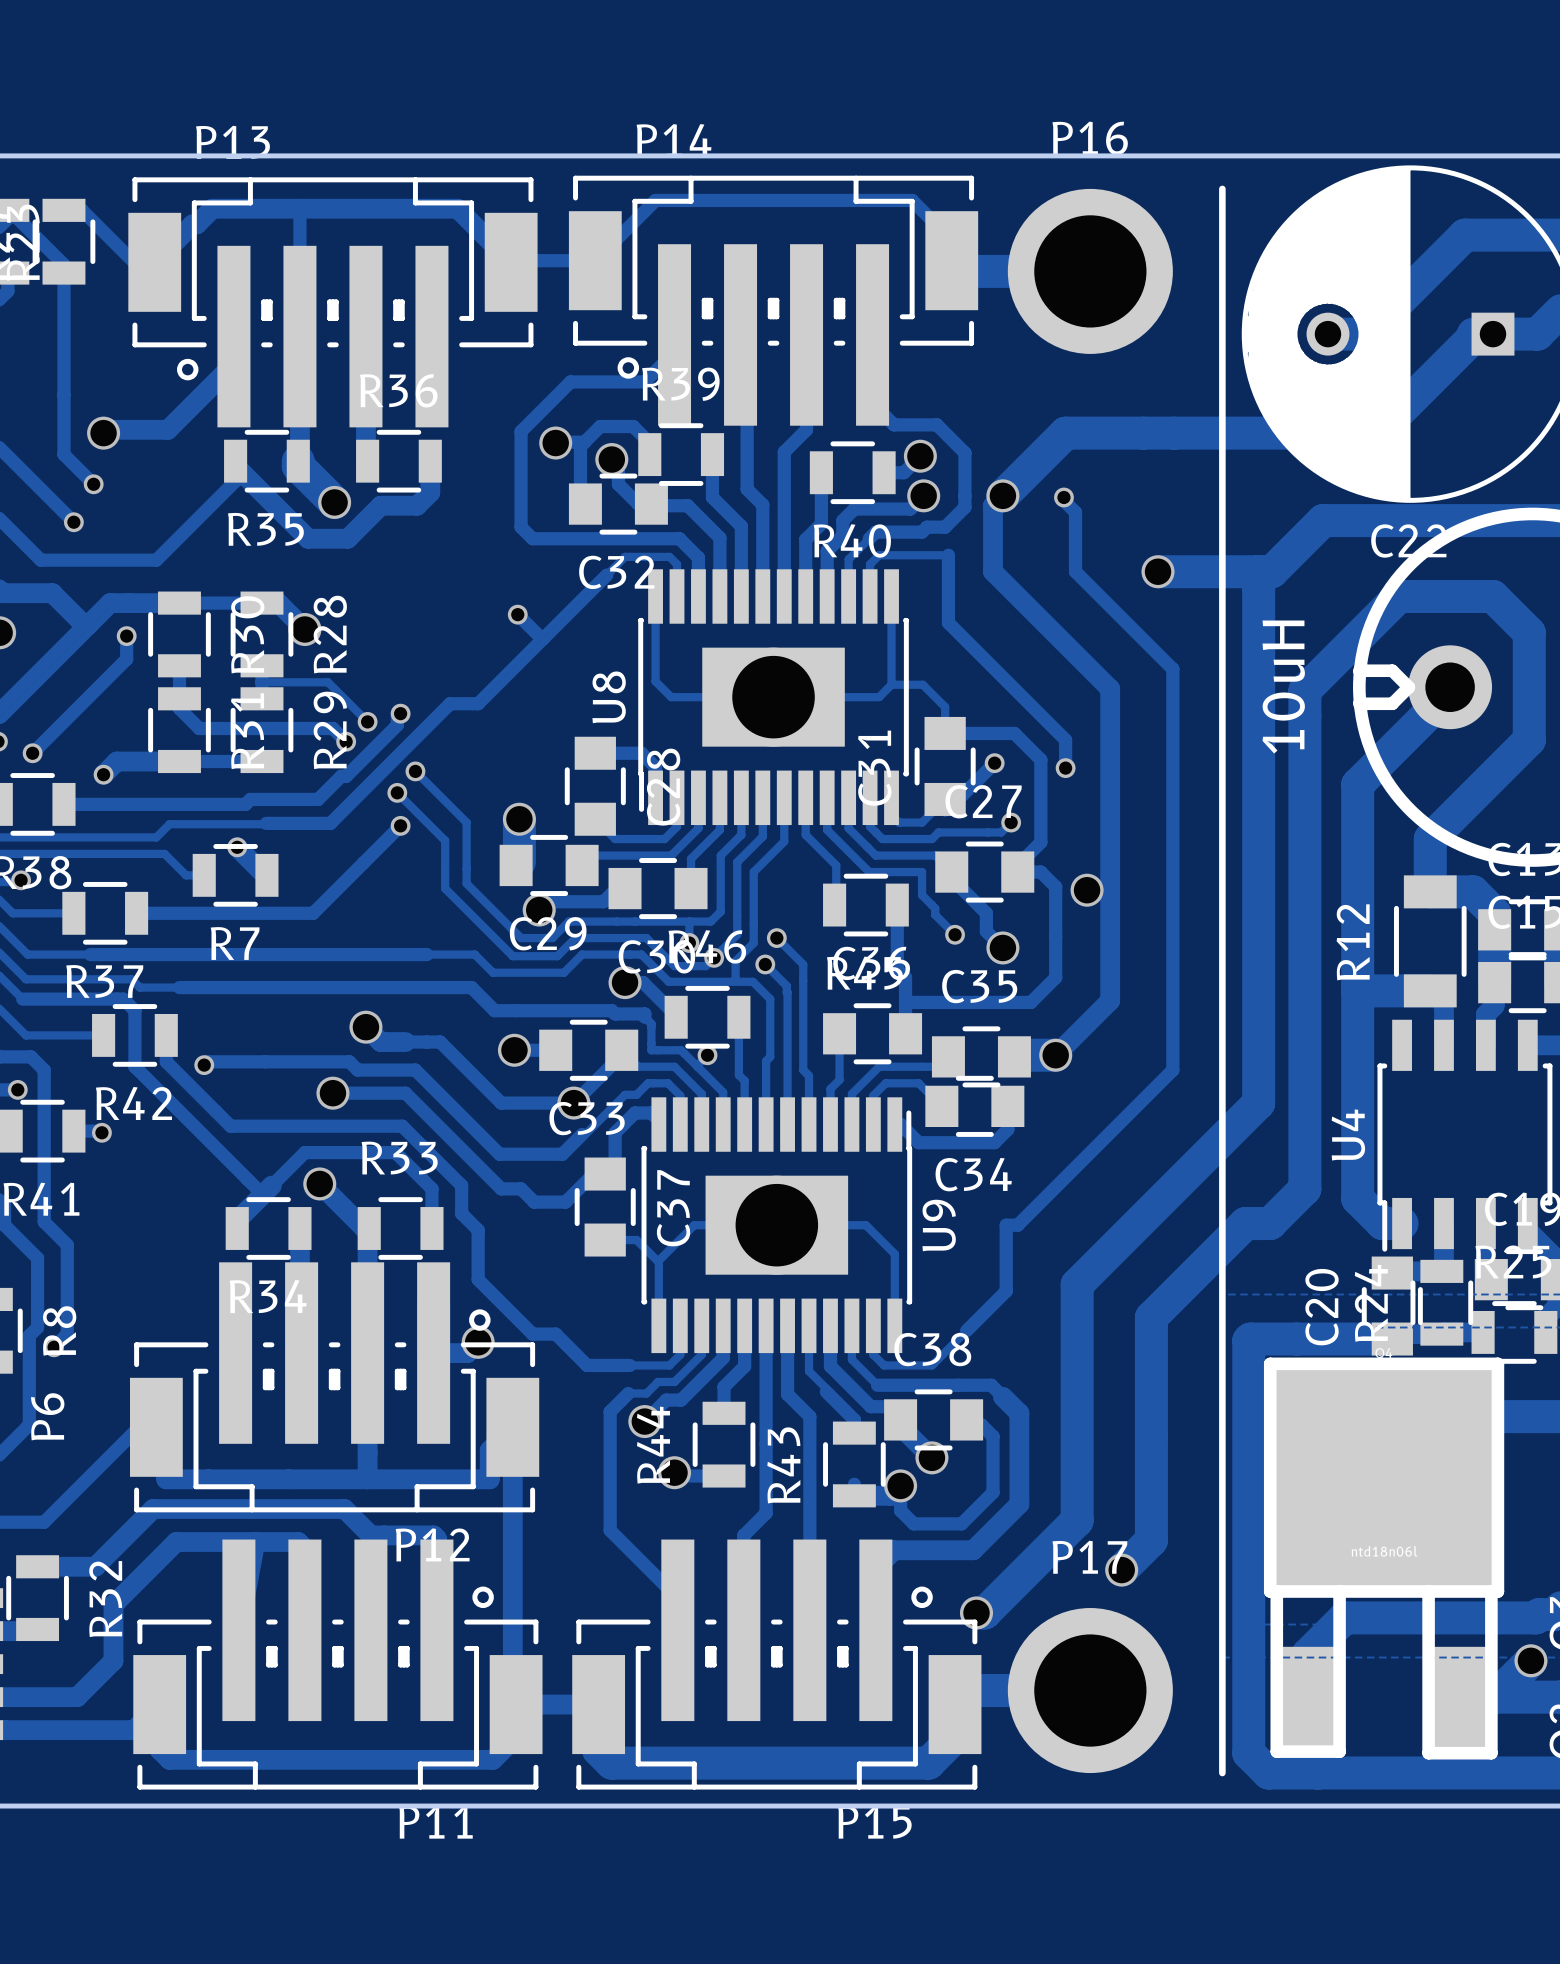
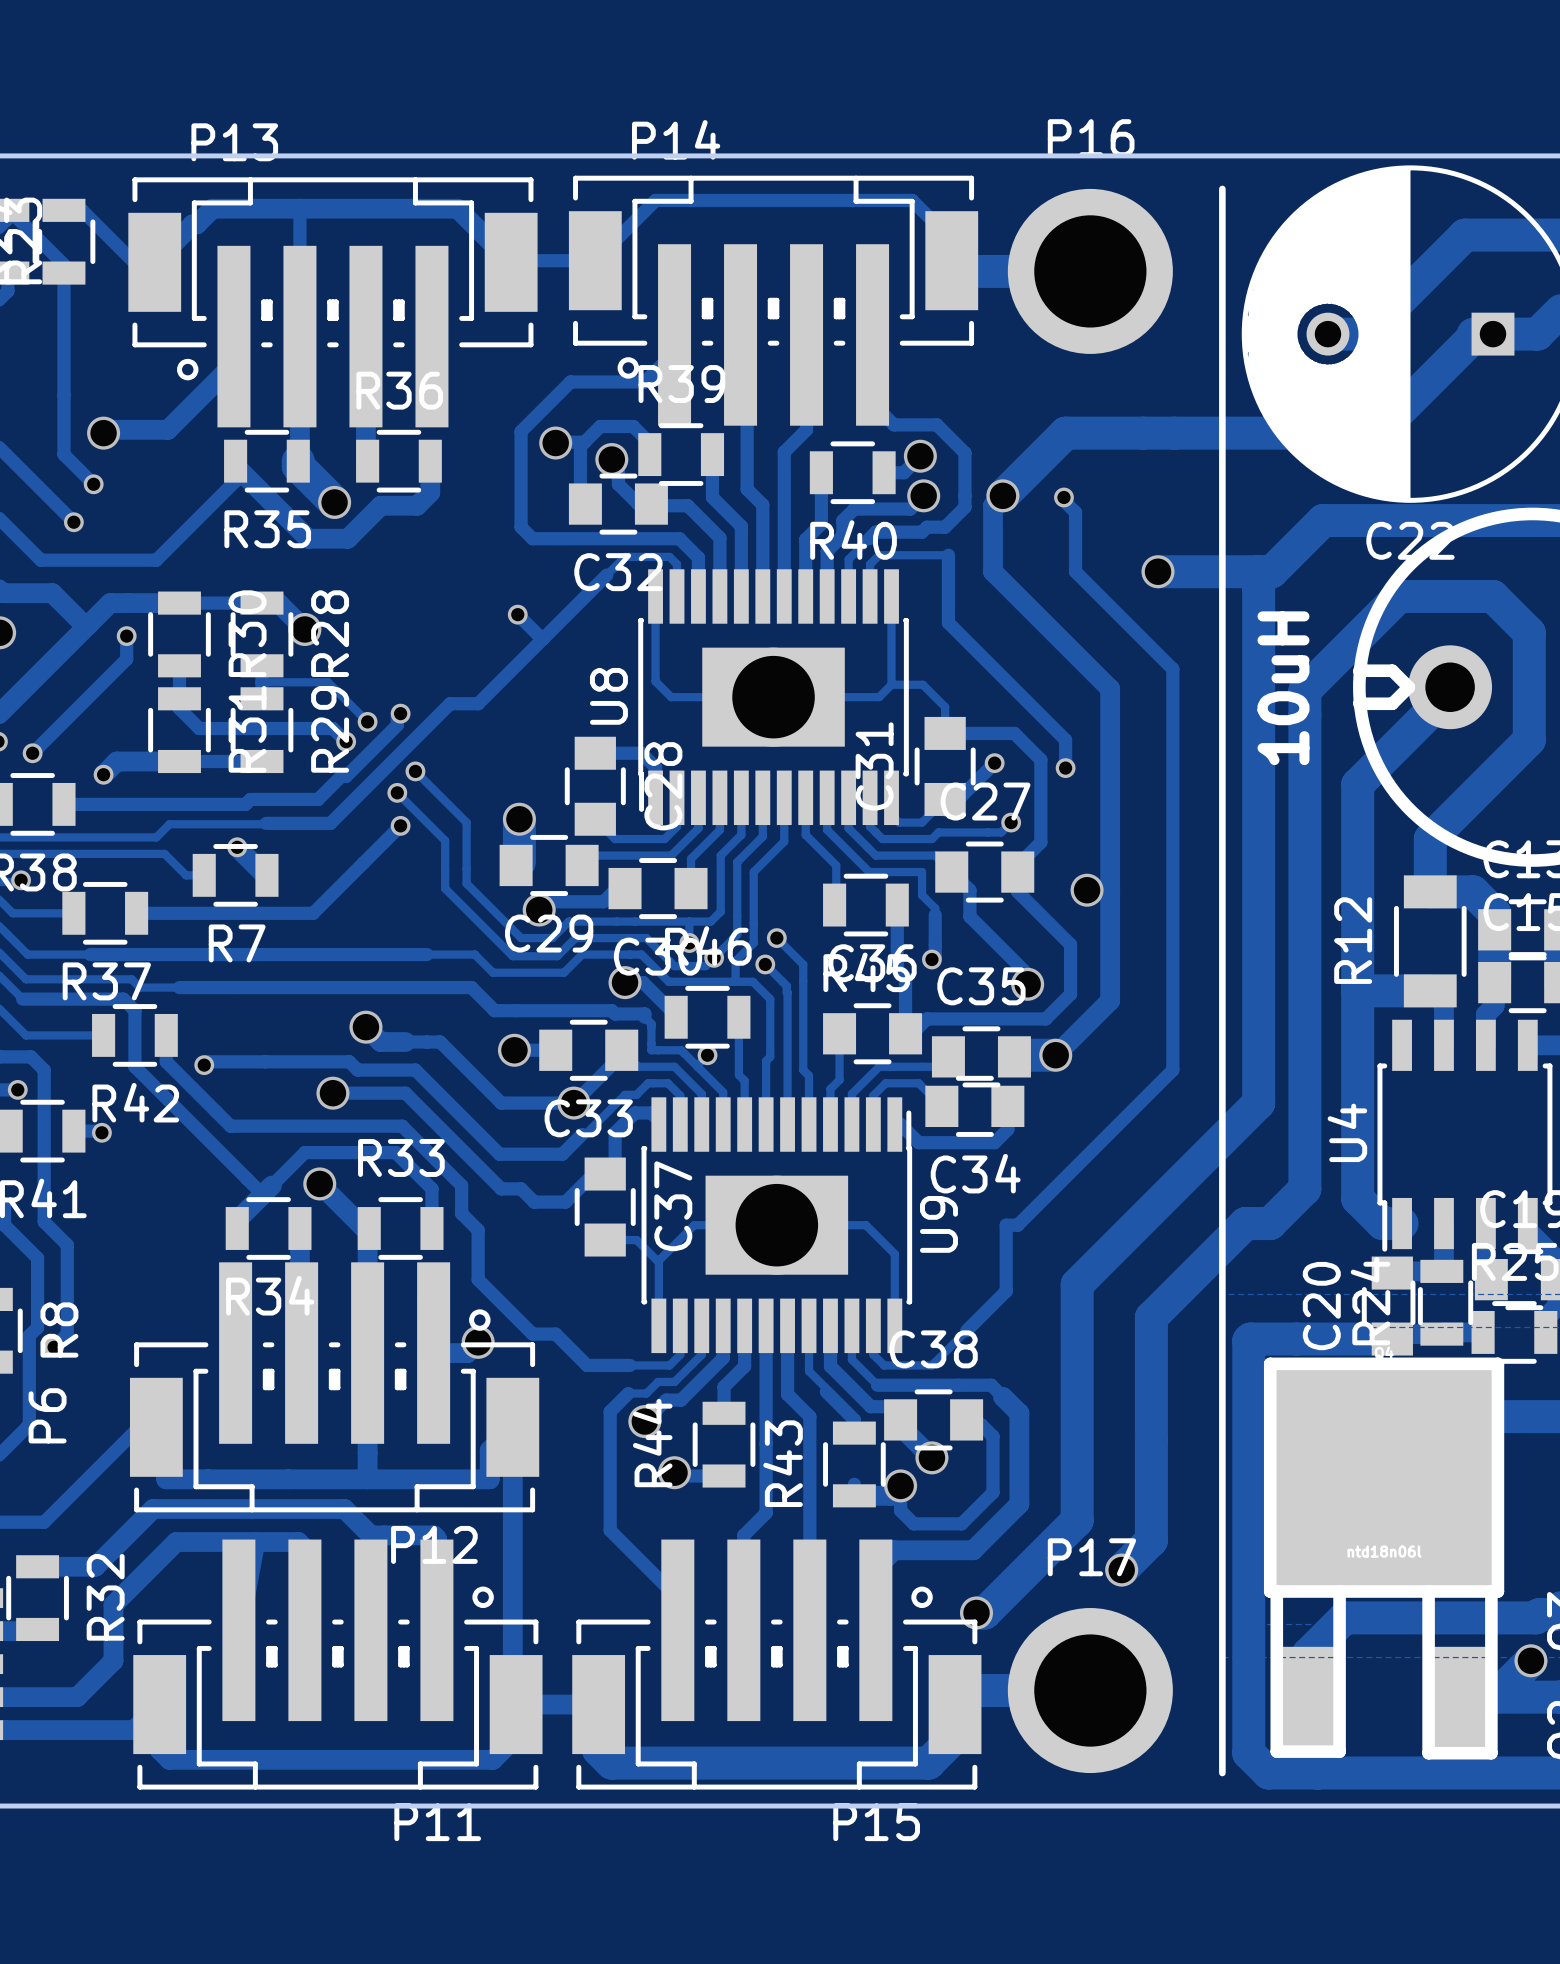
track: none -> (951, 872) (969, 890) (969, 916) (1027, 974) (1027, 984)
track: (1017, 872) (1040, 872) (1055, 886) (1055, 977) (1030, 1002) (905, 1002) -> (1017, 872) (1017, 891) (1070, 944) (1070, 994) (1045, 1018) (927, 1018) (912, 1033) (905, 1033)
track: (951, 878) (986, 913) (986, 931) (1002, 947) -> none
track: (935, 914) (955, 934) -> (935, 914) (935, 956) (931, 959)
via position: (955, 934) -> (931, 959)
via position: (1002, 947) -> (1027, 984)

